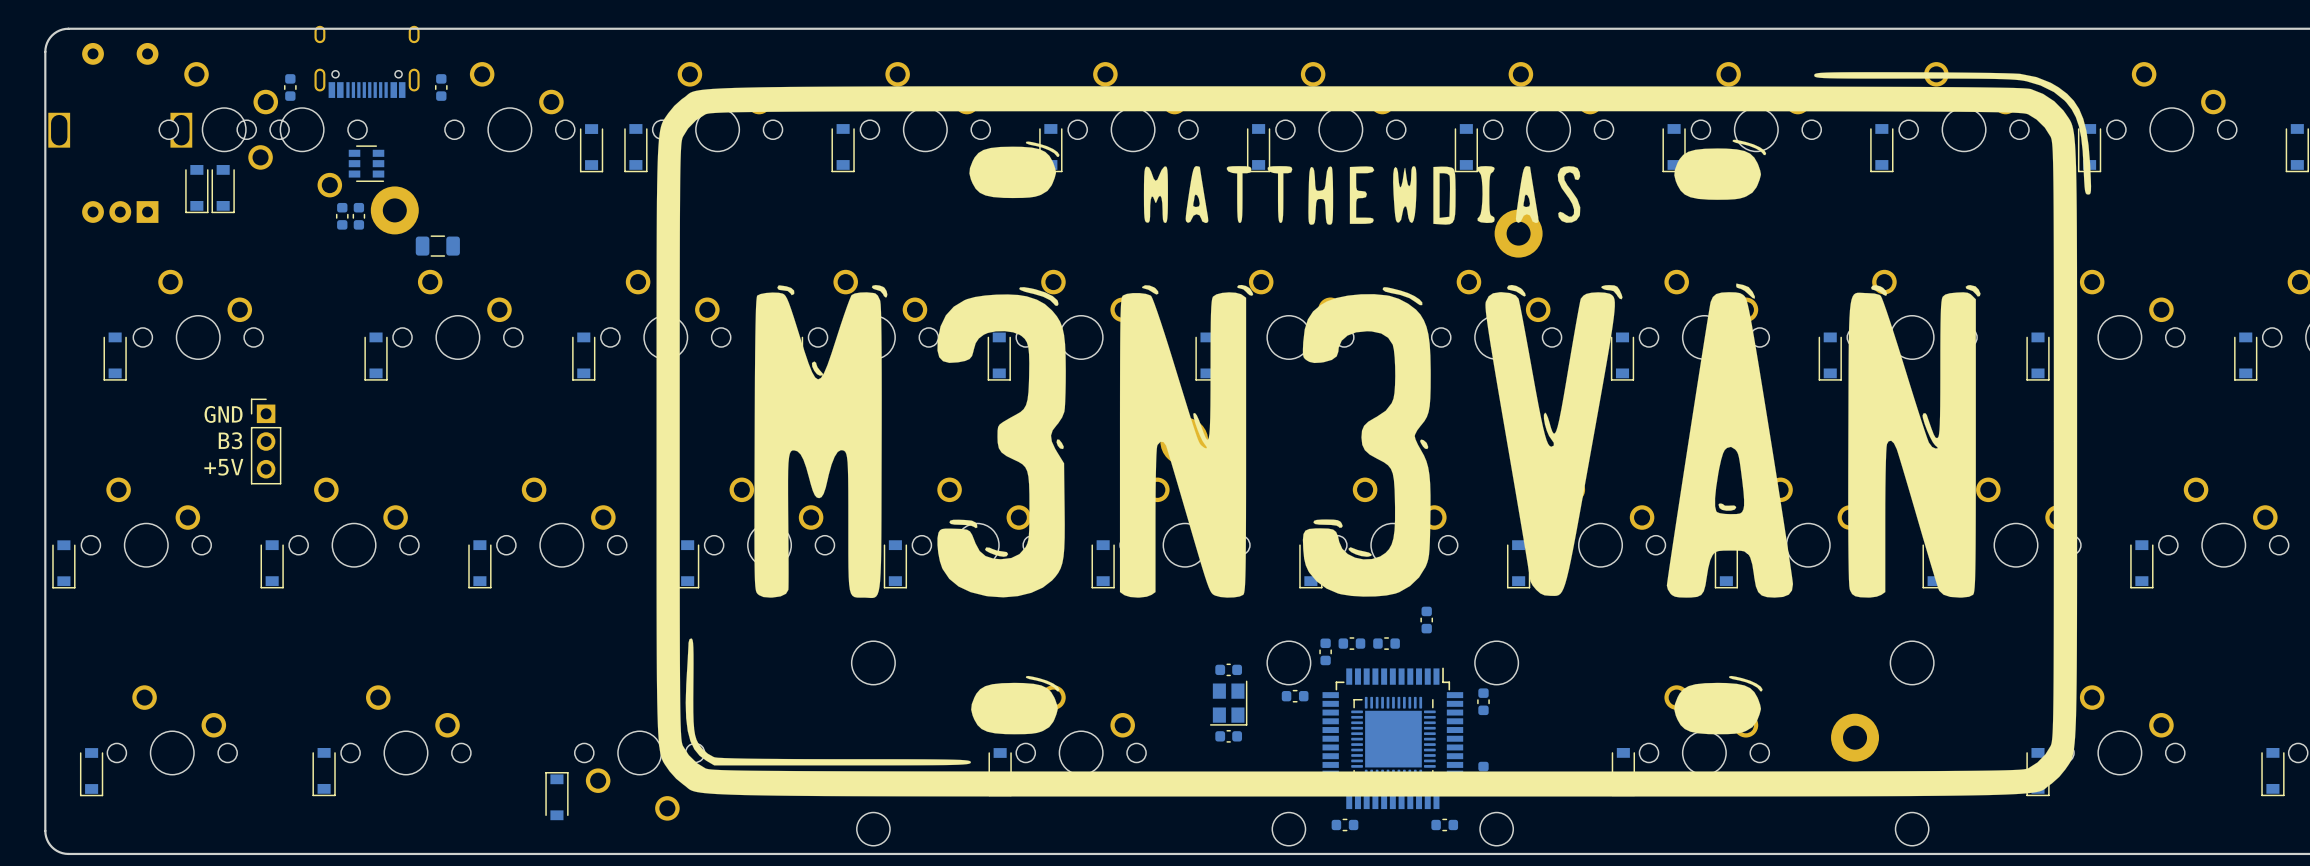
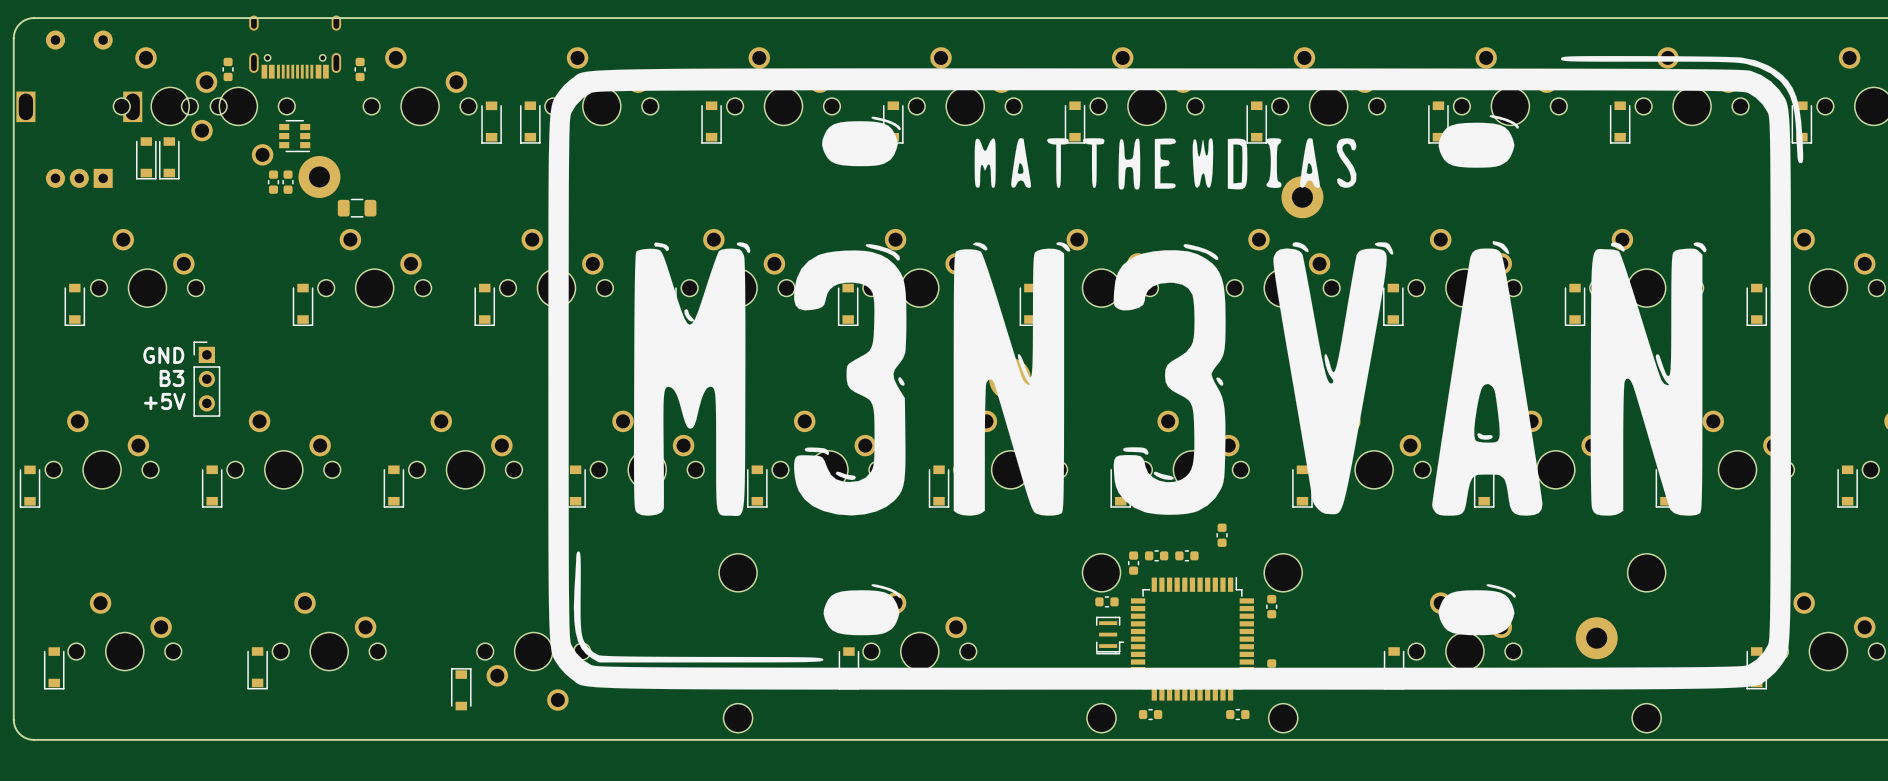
part: (1228, 669) -> none
part: (1228, 703) -> none
part: none -> (1110, 635)
part: (1228, 736) -> none
part: (1393, 739) -> none

